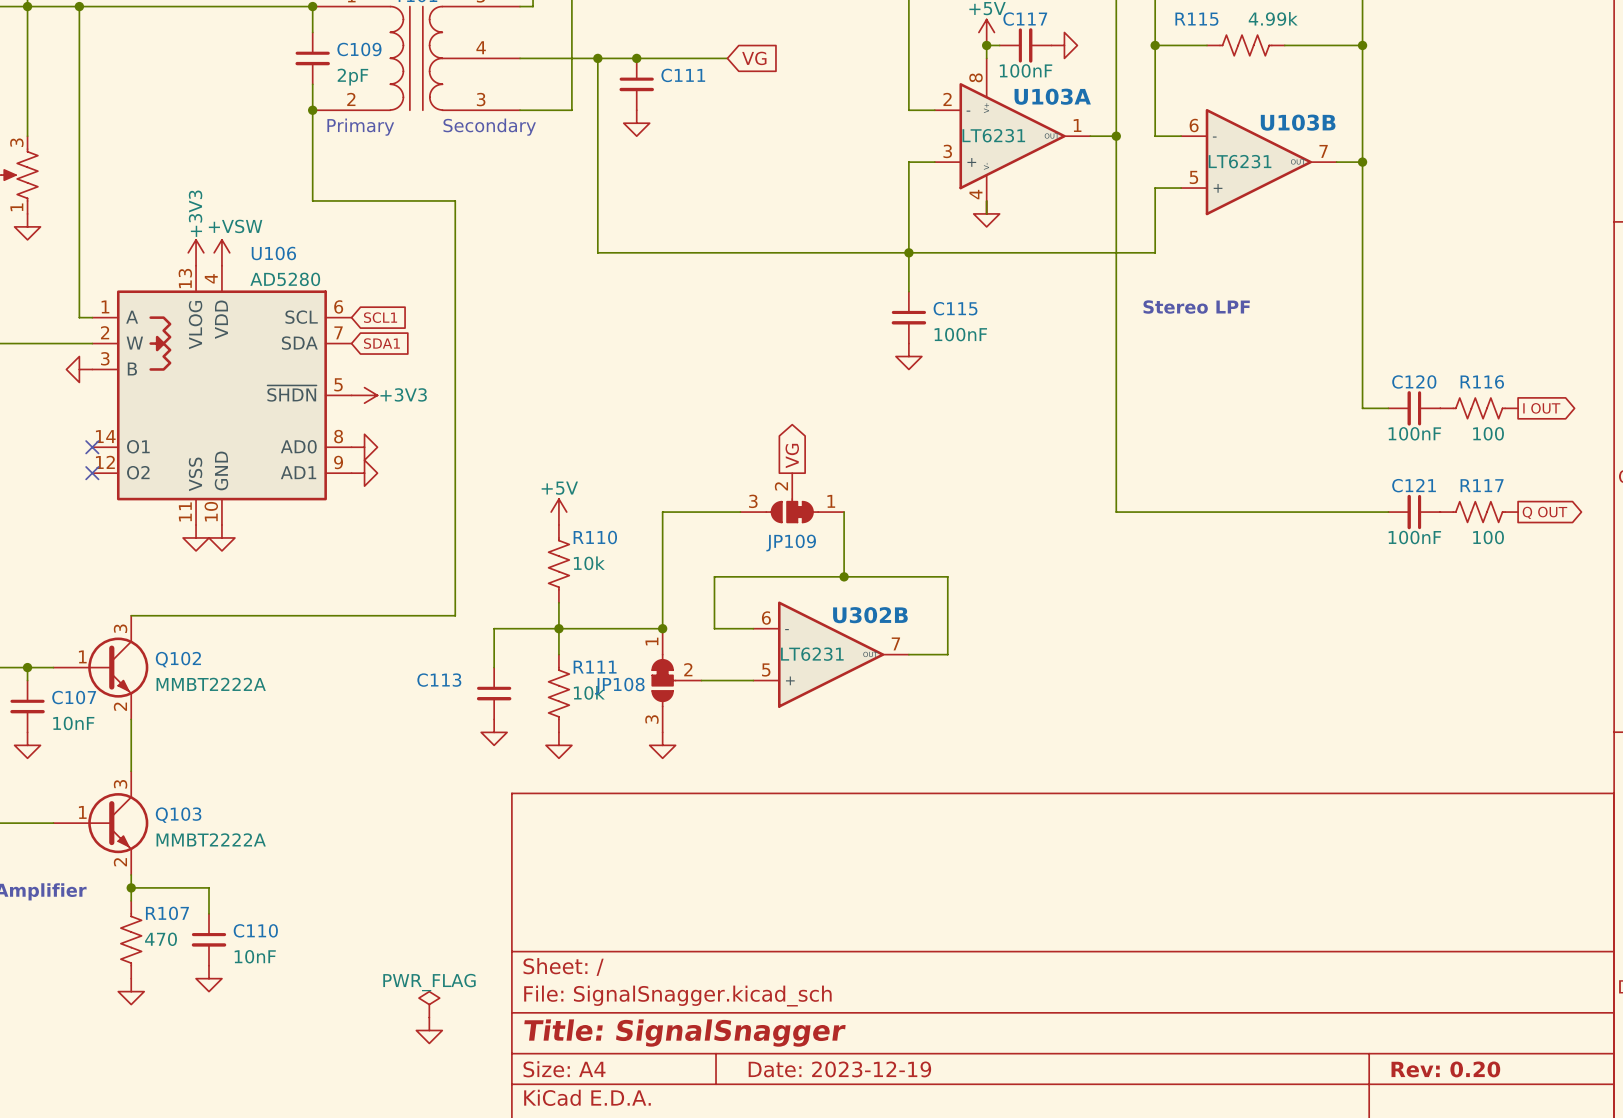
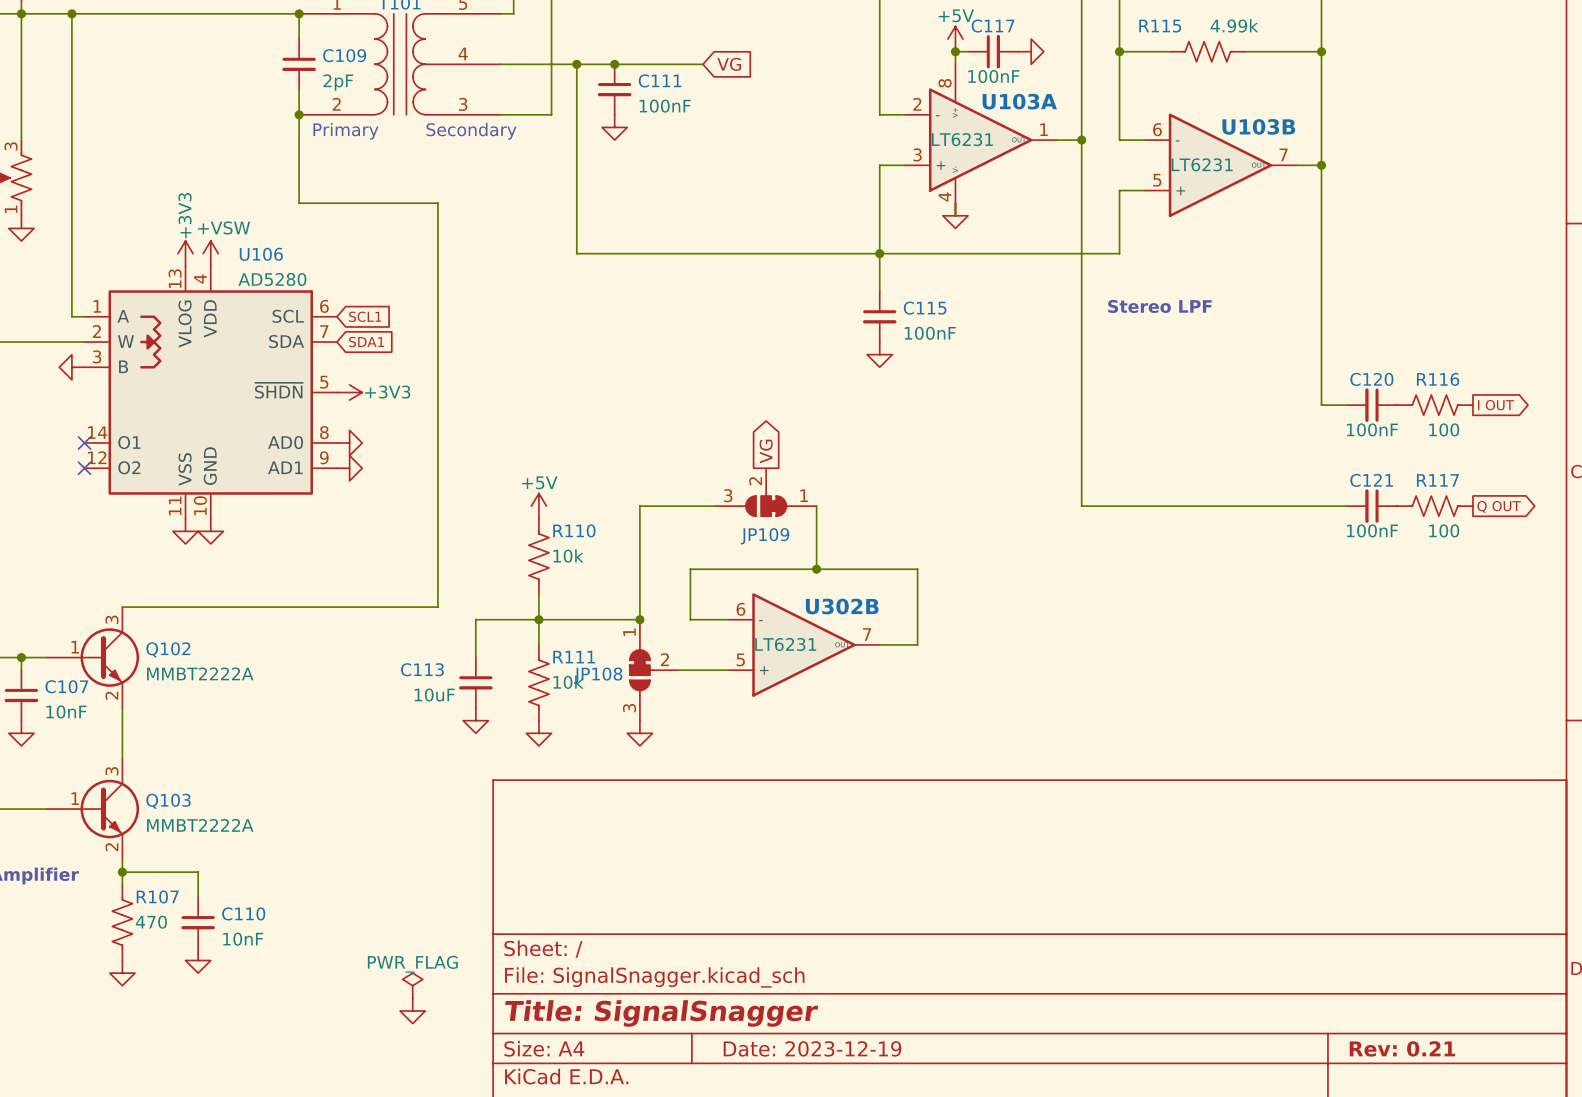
C111 value: none -> 100nF (665, 106)
C113 value: none -> 10uF (434, 694)
title block: Rev: 0.20 (1445, 1069) -> Rev: 0.21 (1402, 1048)

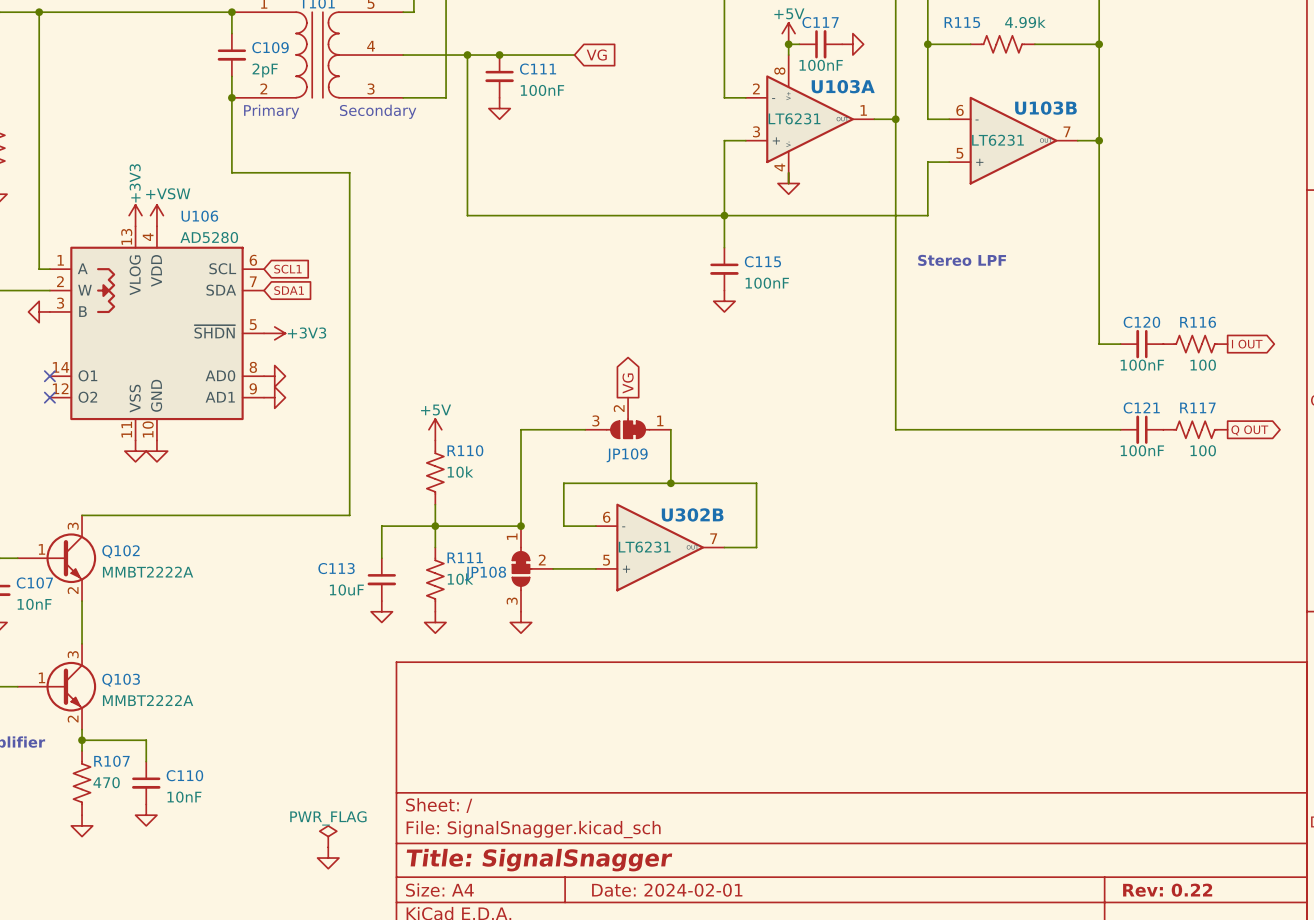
title block: Date: 2023-12-19 (812, 1048) -> Date: 2024-02-01 (667, 890)
title block: Rev: 0.21 (1402, 1048) -> Rev: 0.22 (1167, 890)

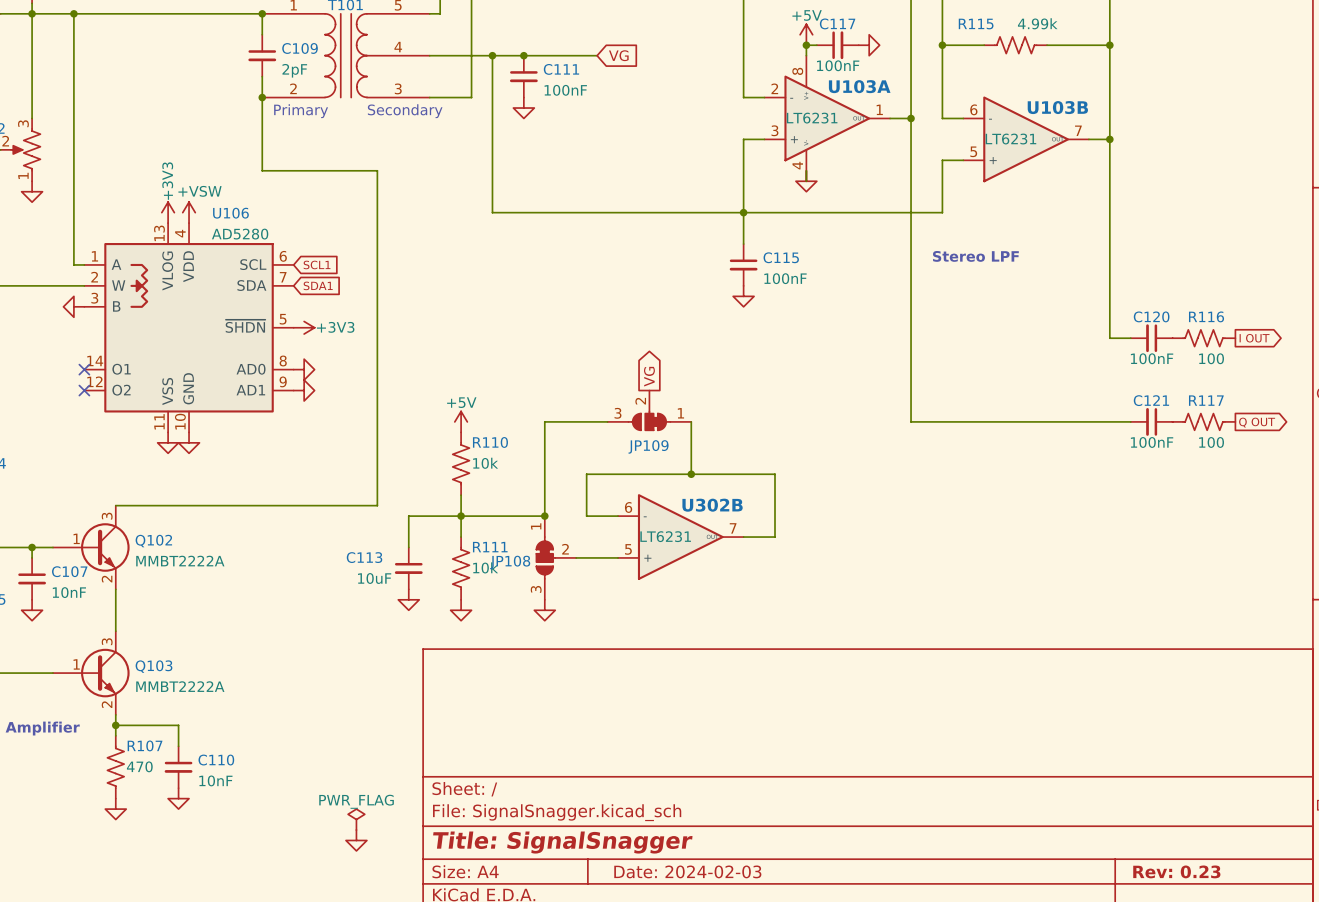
title block: Date: 2024-02-01 (667, 890) -> Date: 2024-02-03 (687, 871)
title block: Rev: 0.22 (1167, 890) -> Rev: 0.23 (1176, 871)

